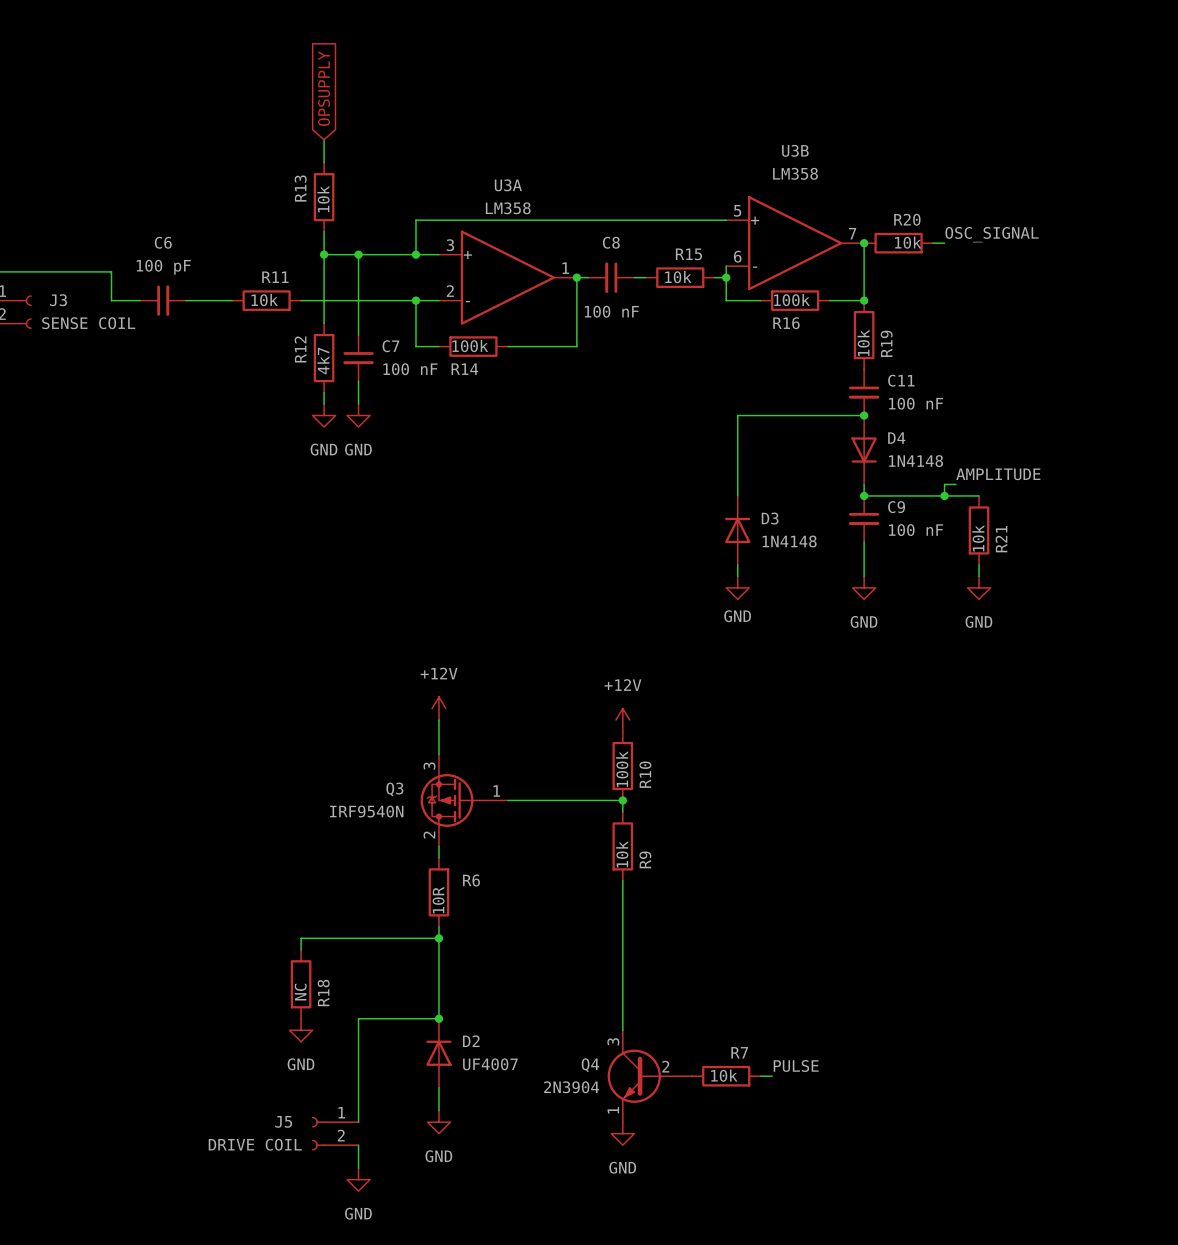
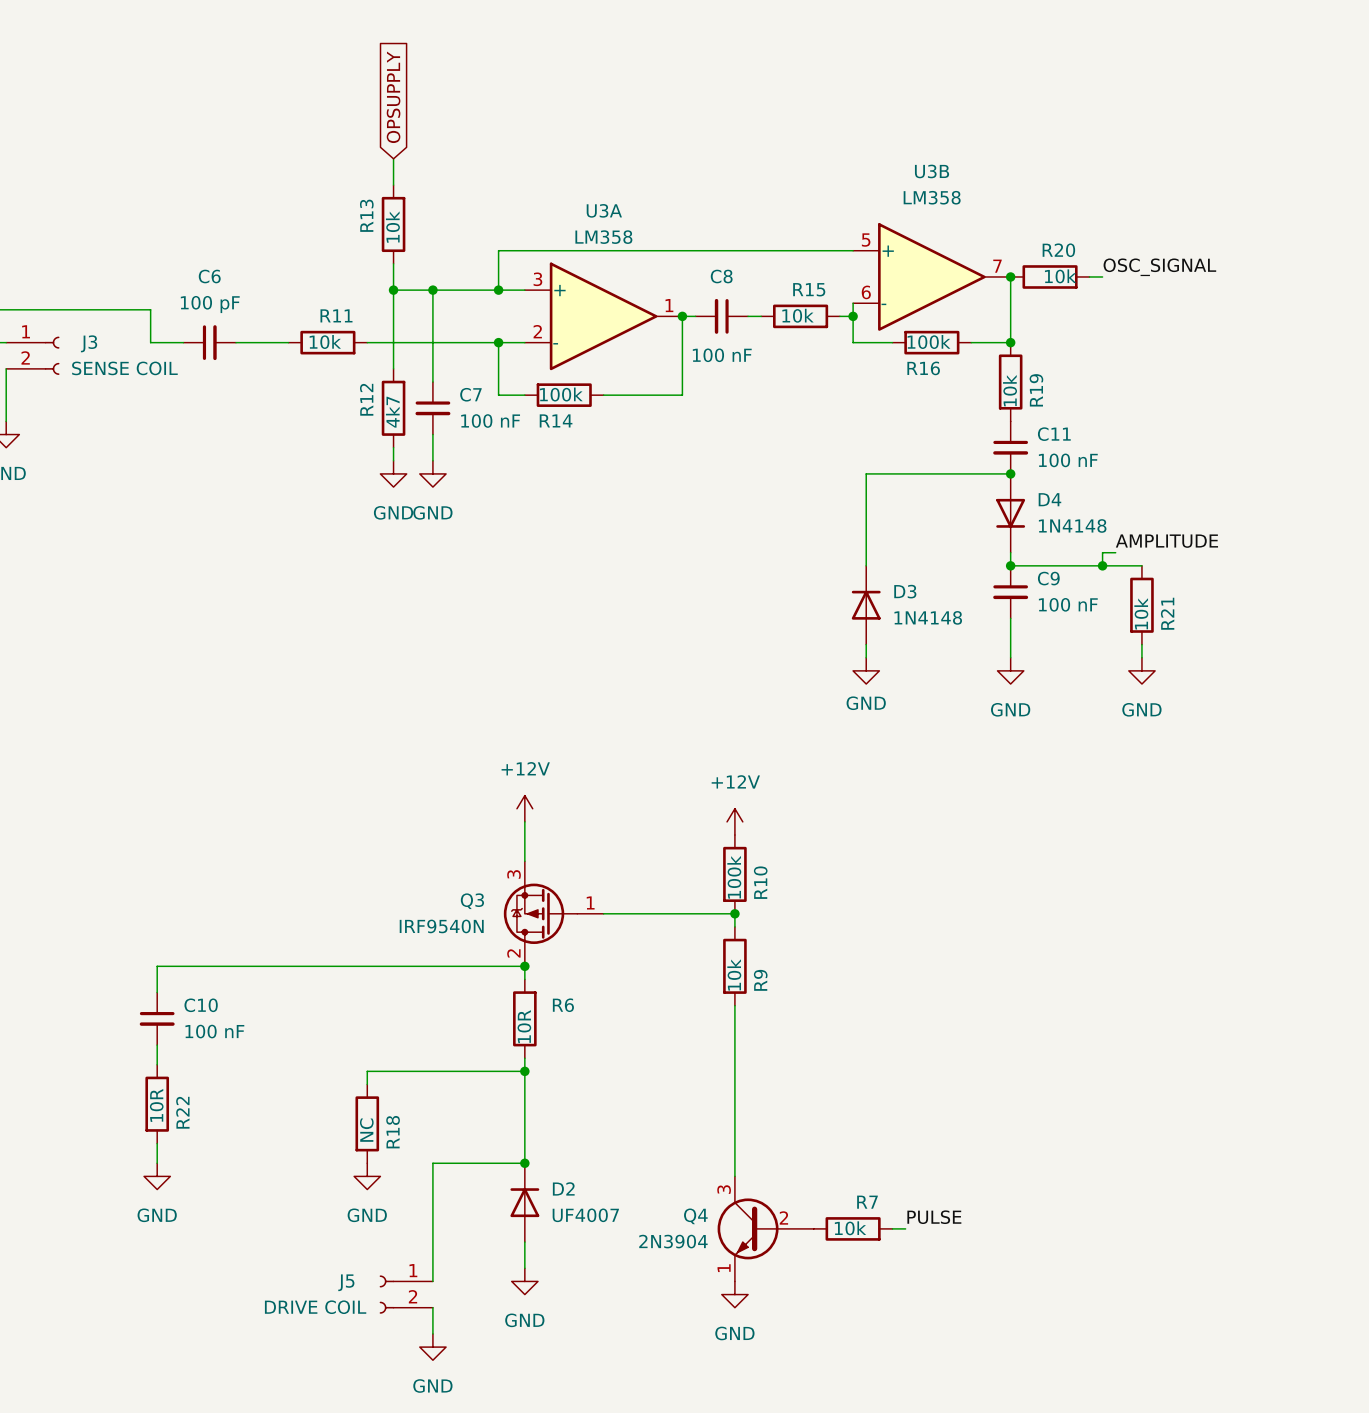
wire: none -> (524, 966) (157, 966) (157, 992)
junction: none -> (524, 966)
C10: none -> 100 nF (157, 1018)
wire: none -> (157, 1045) (157, 1064)
R22: none -> 10R (157, 1104)
wire: none -> (157, 1143) (157, 1163)
power symbol: none -> GND (157, 1176)

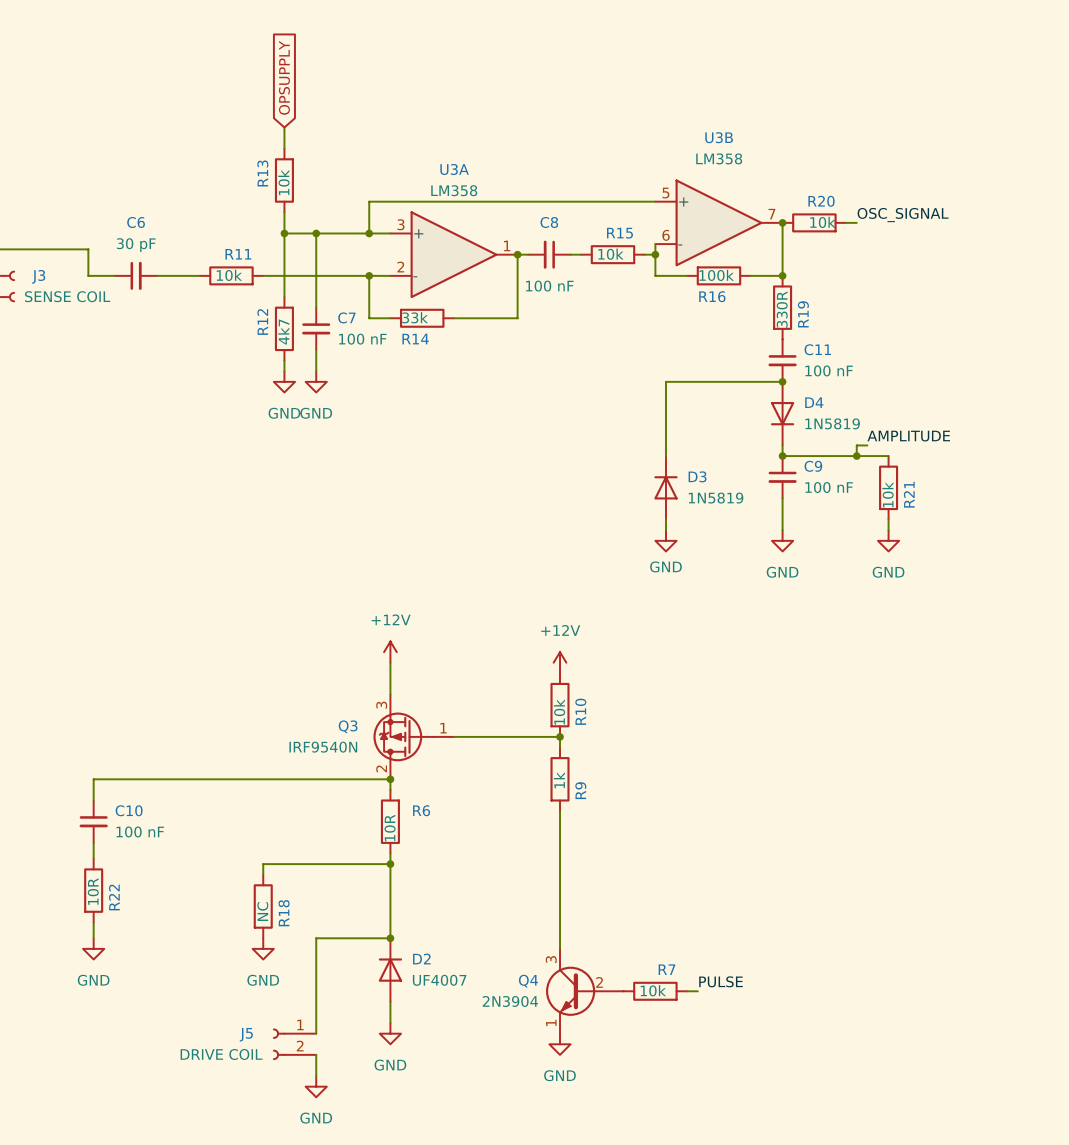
C6 value: 100 pF (210, 304) -> 30 pF (136, 245)
R19 value: 10k (1010, 390) -> 330R (782, 309)
R14 value: 100k (561, 394) -> 33k (415, 317)
D4 value: 1N4148 (1072, 525) -> 1N5819 (832, 423)
D3 value: 1N4148 (928, 617) -> 1N5819 (716, 498)
R10 value: 100k (734, 877) -> 10k (559, 712)
R9 value: 10k (734, 974) -> 1k (559, 780)

